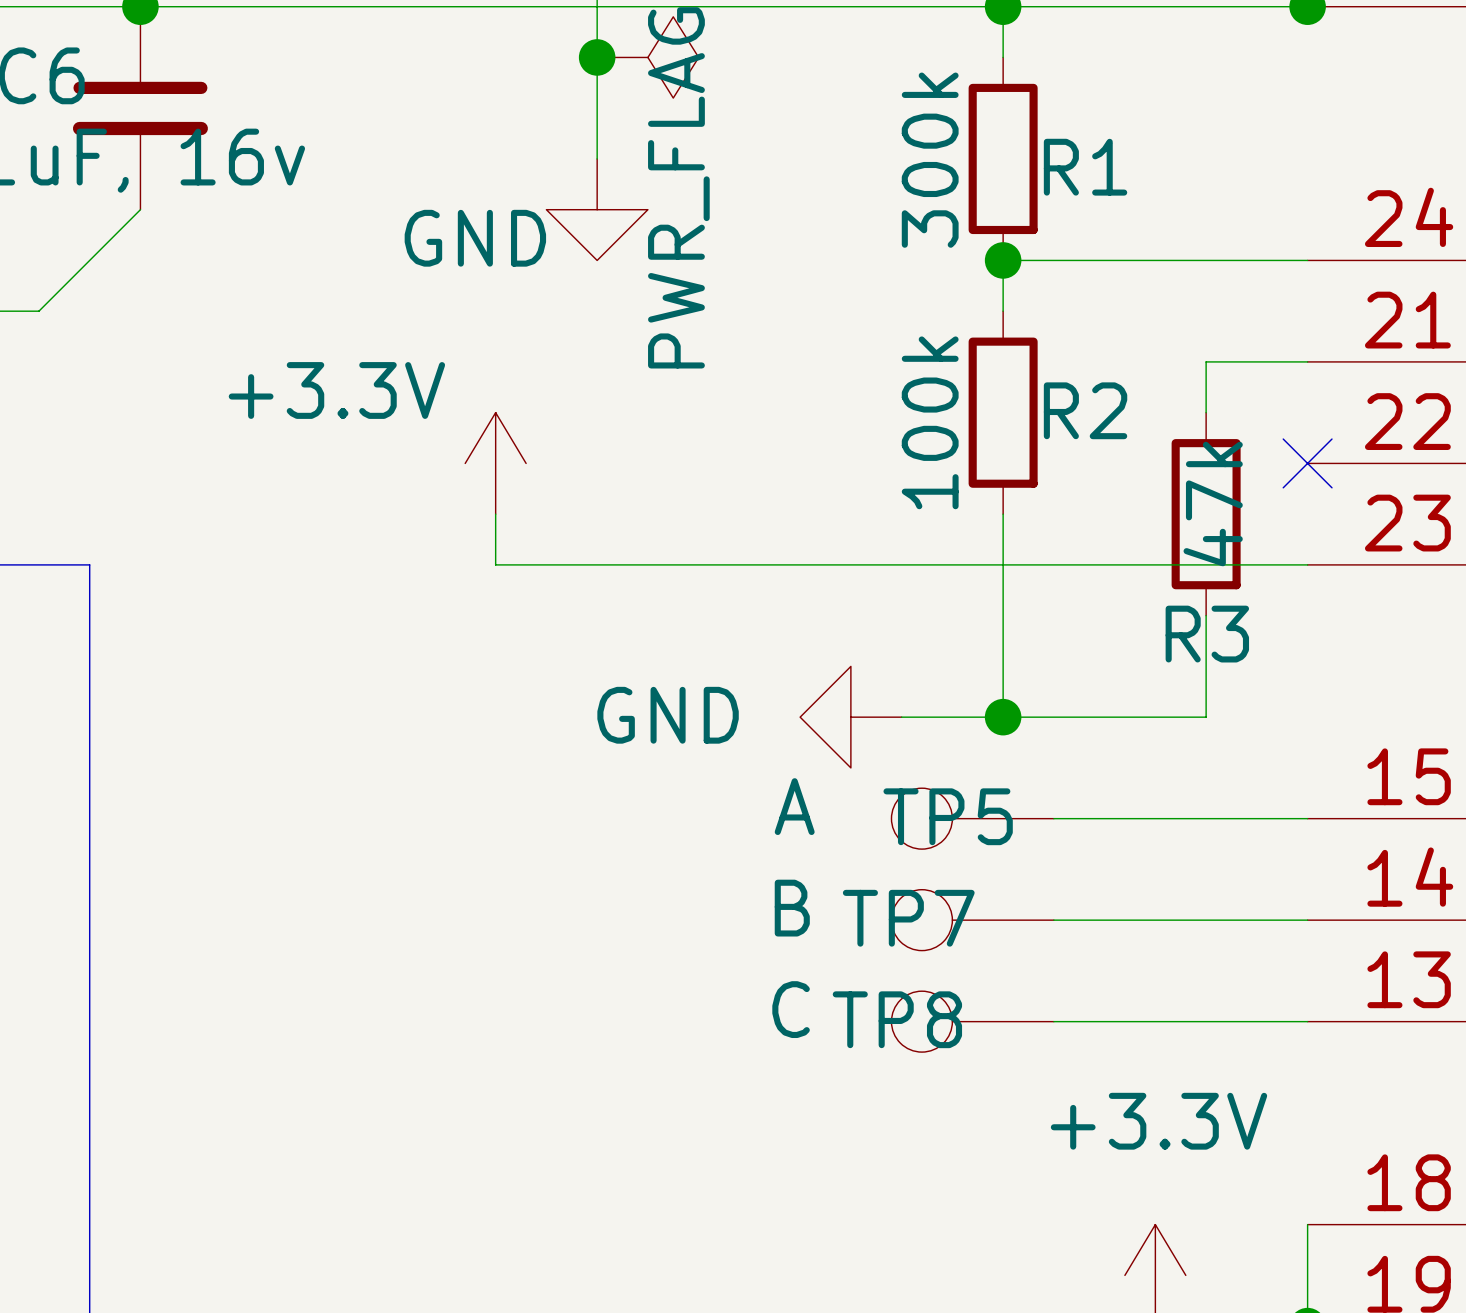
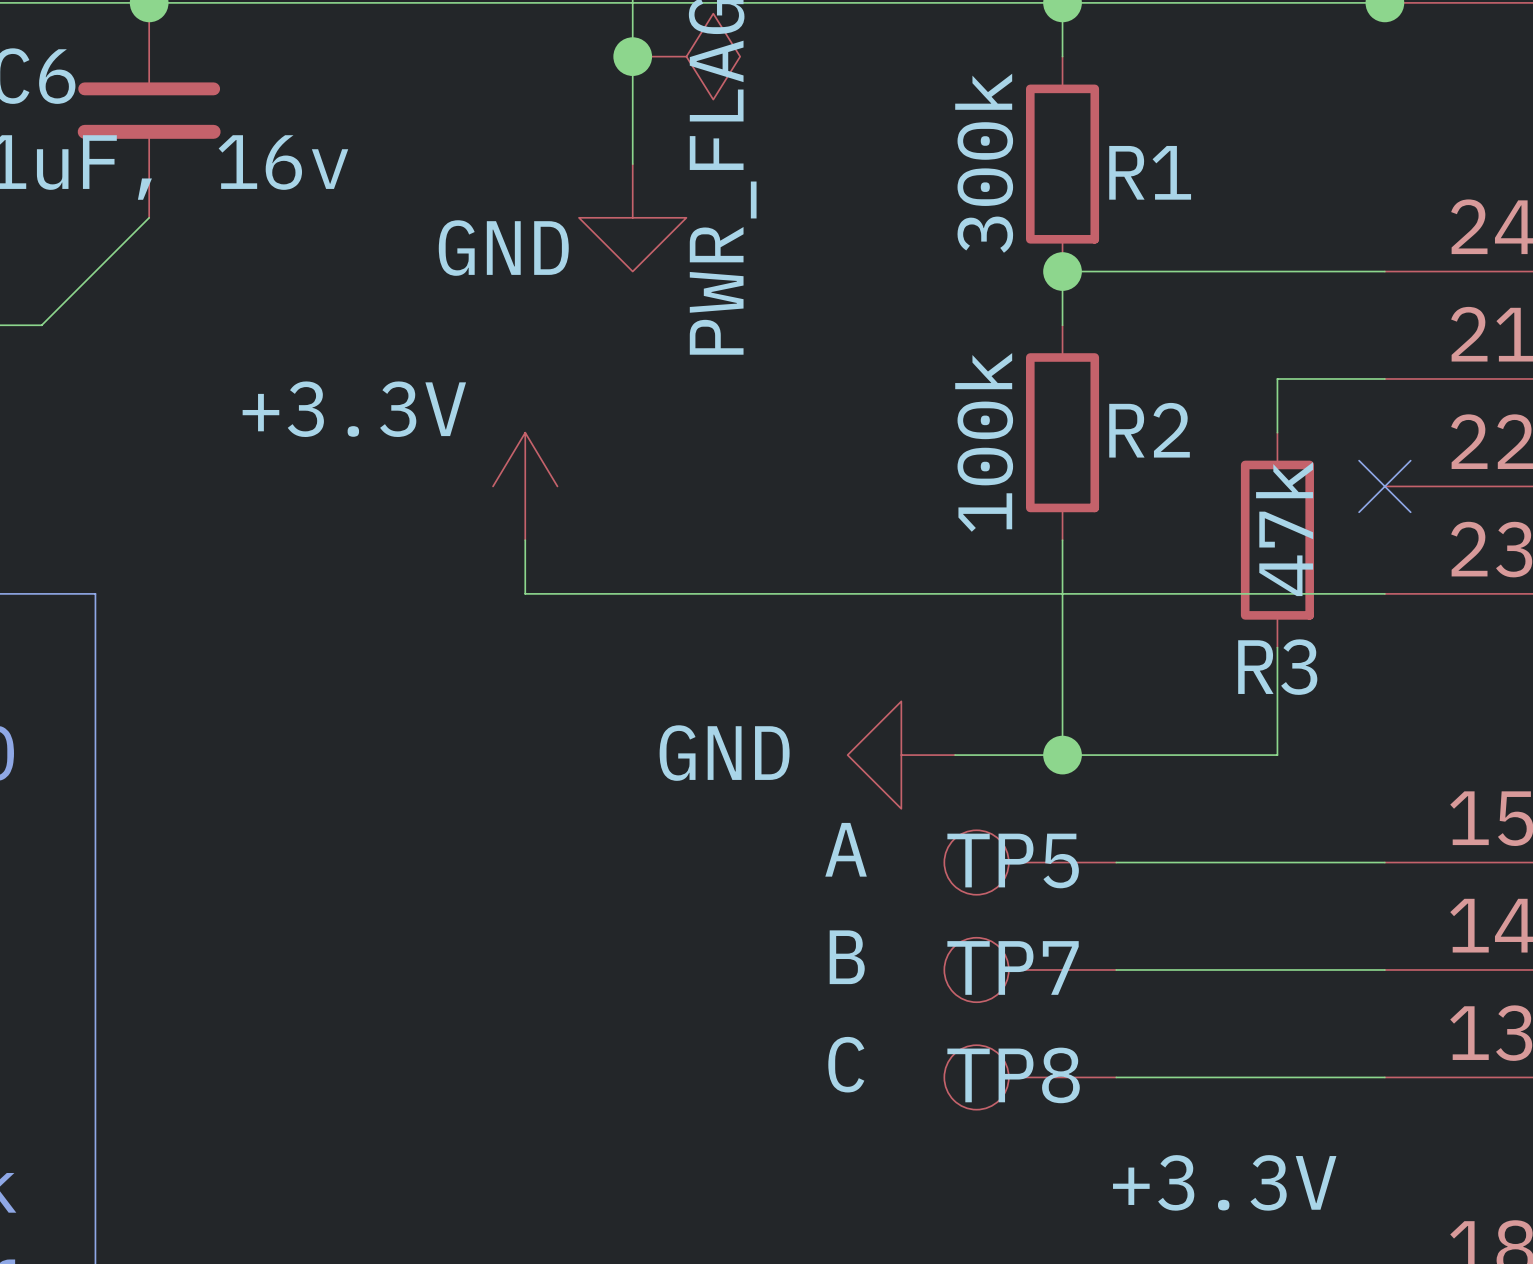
TP7 name position: TP7 (908, 918) -> TP7 (1013, 967)
TP8 name position: TP8 (897, 1019) -> TP8 (1013, 1075)

